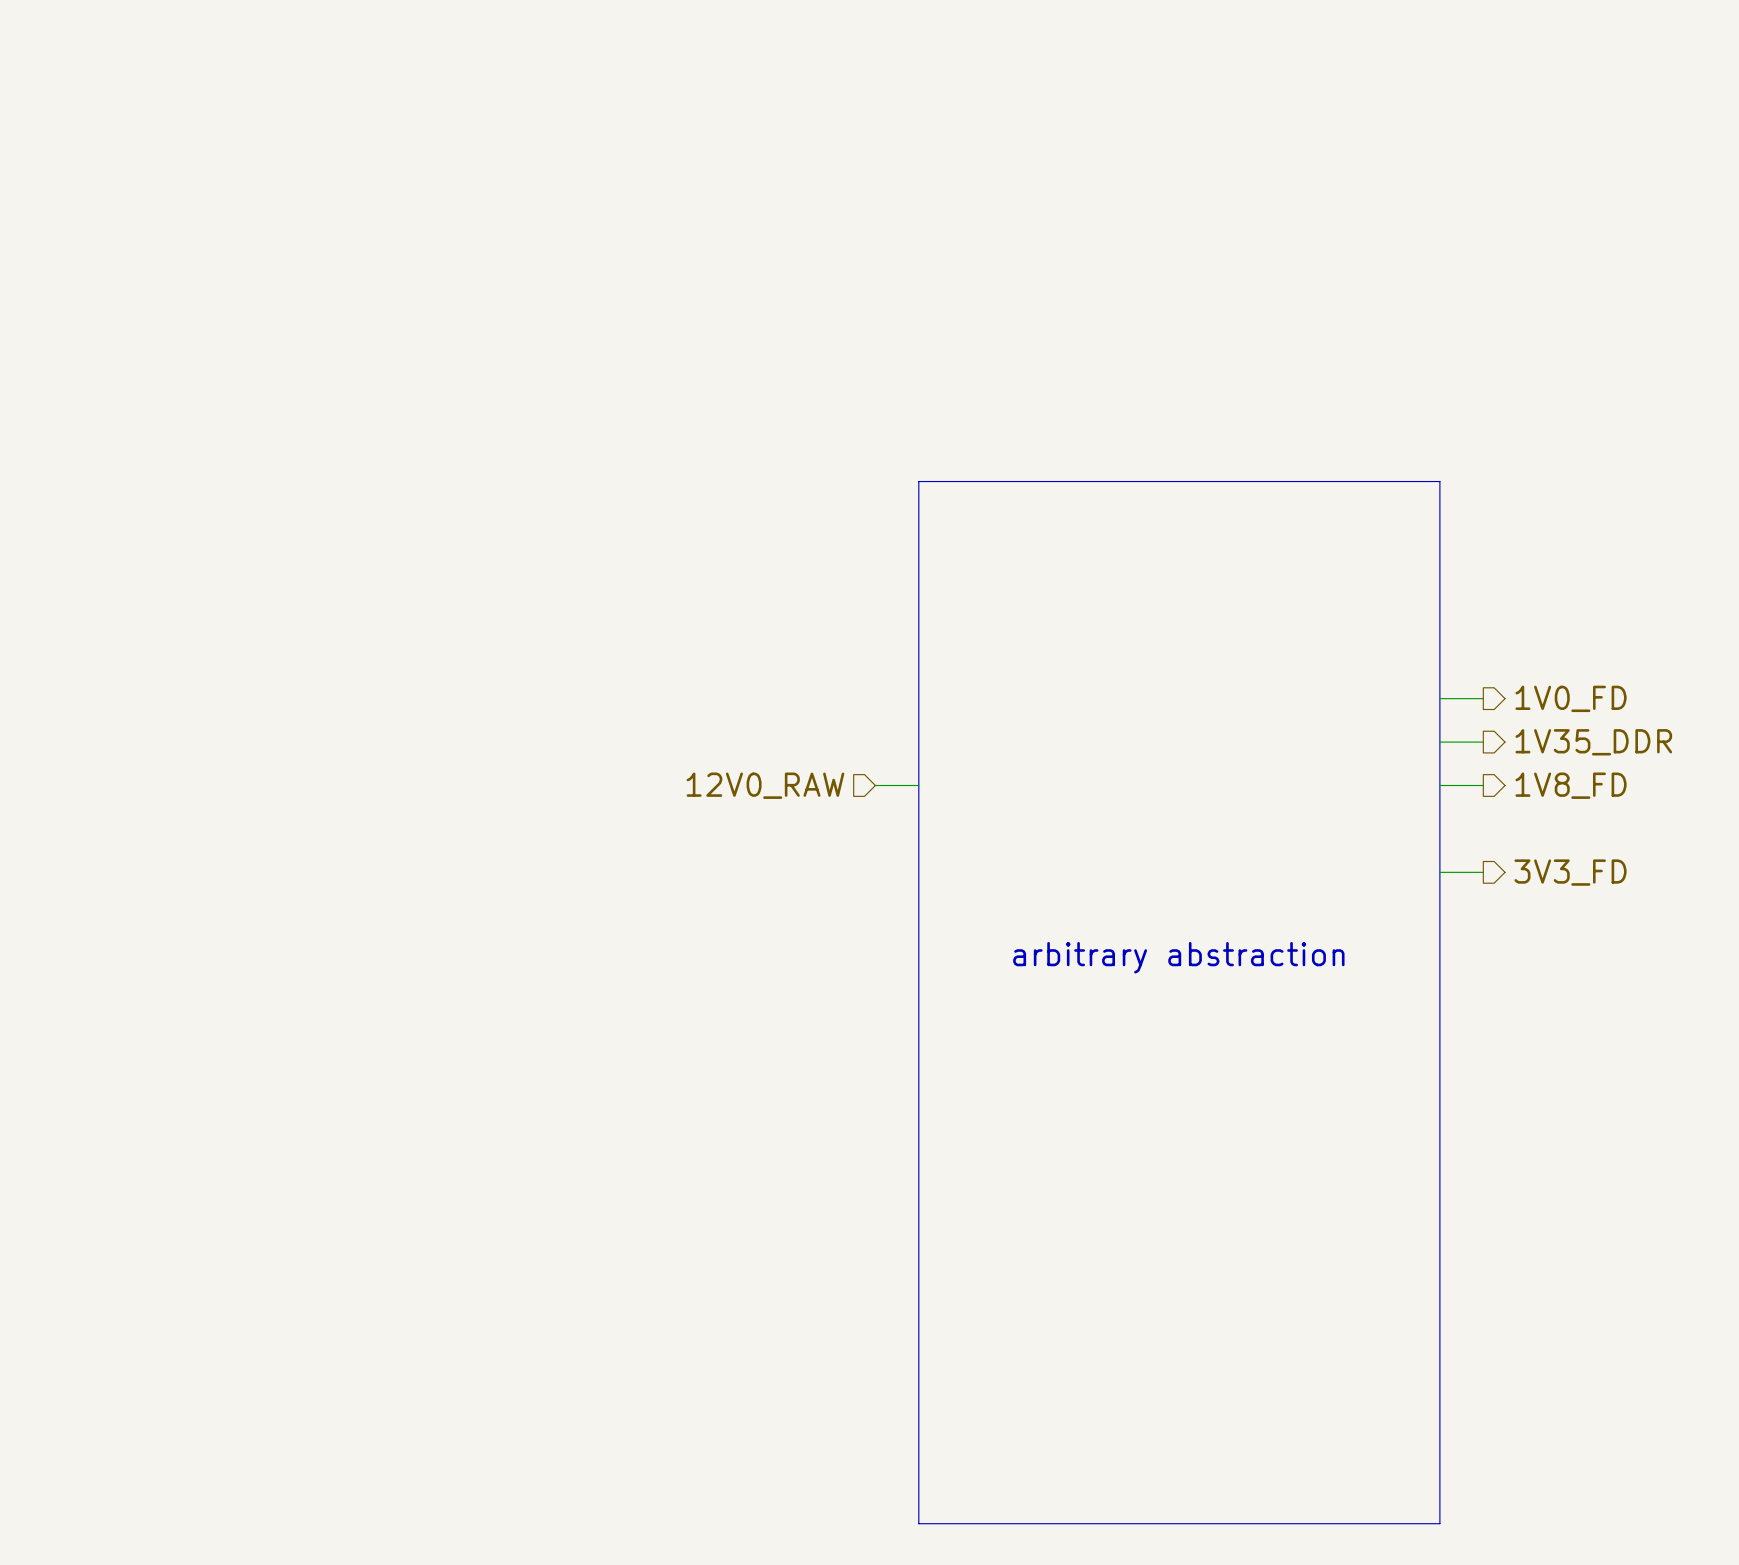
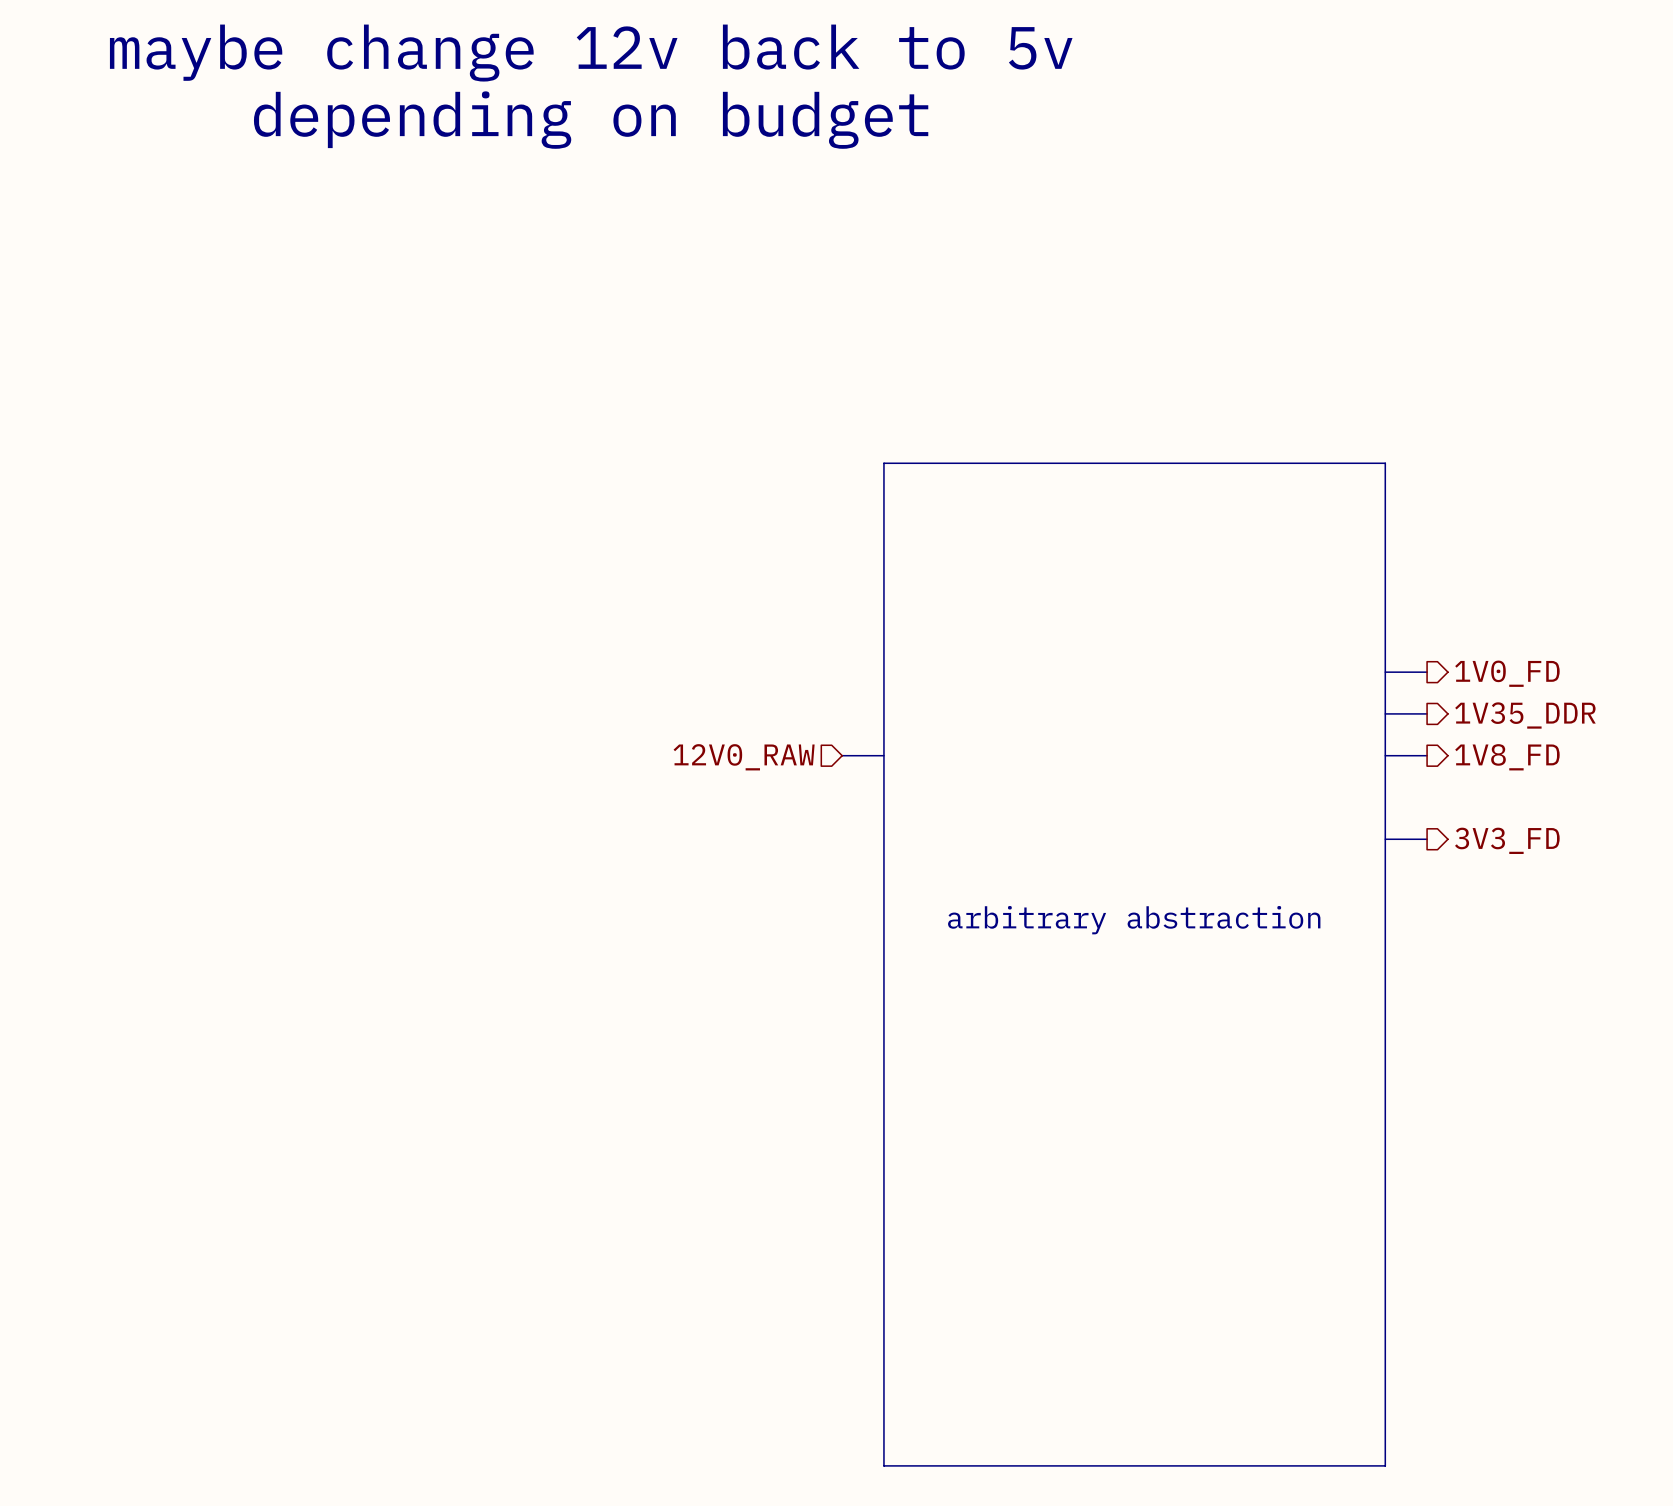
text: none -> maybe change 12v back to 5v (591, 53)
text: none -> depending on budget (591, 120)

